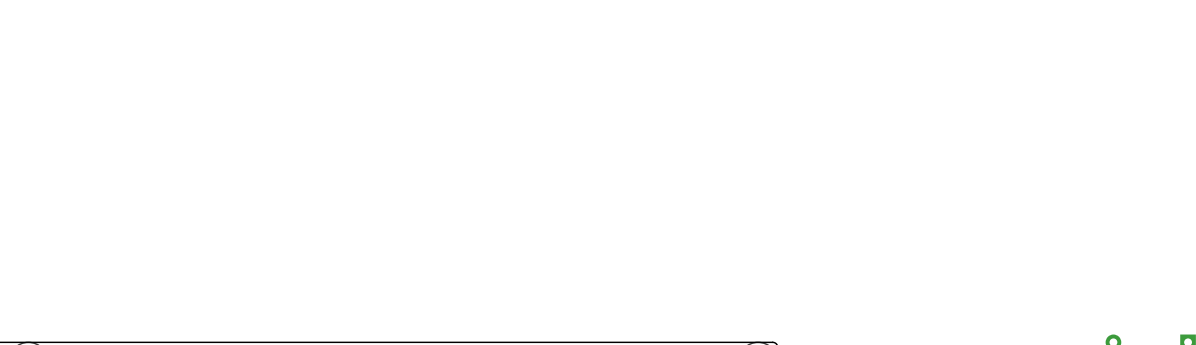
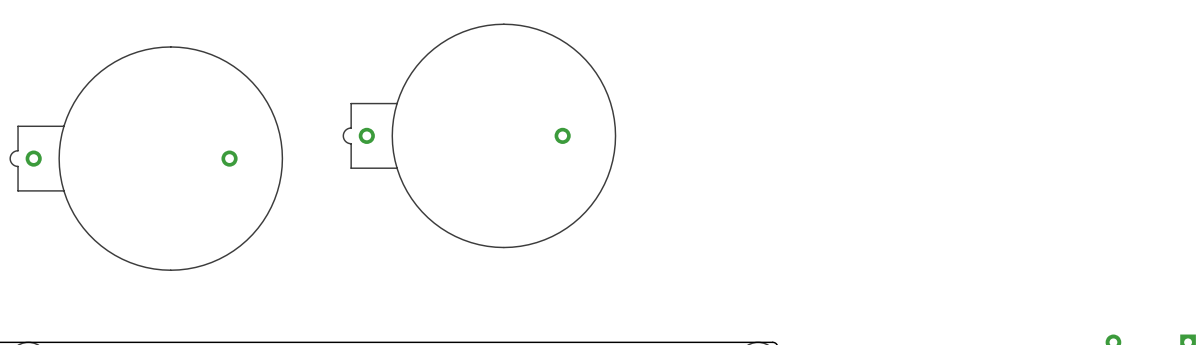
part: none -> (479, 135)
part: none -> (146, 158)

